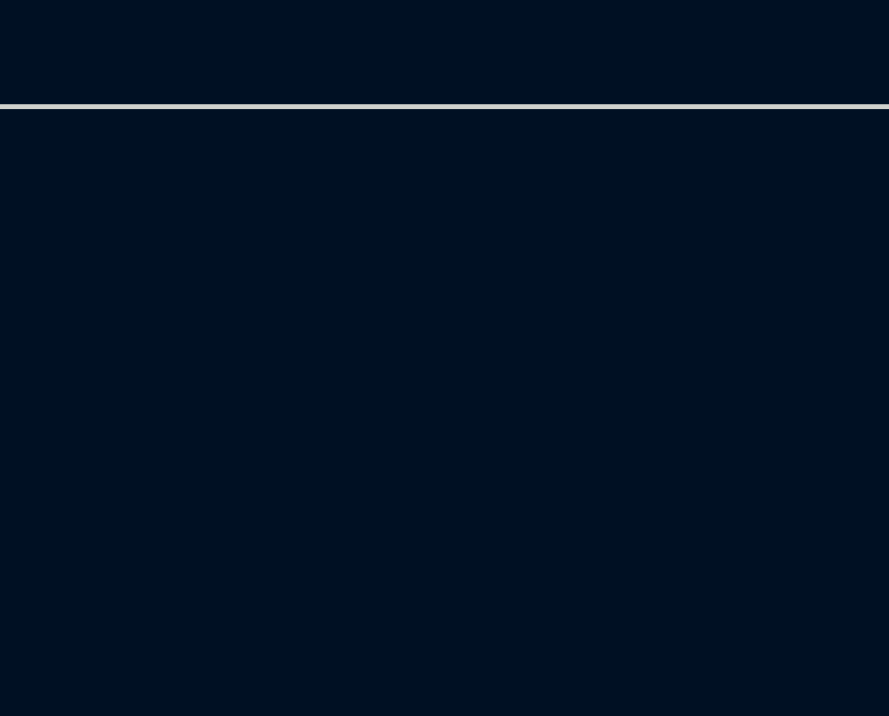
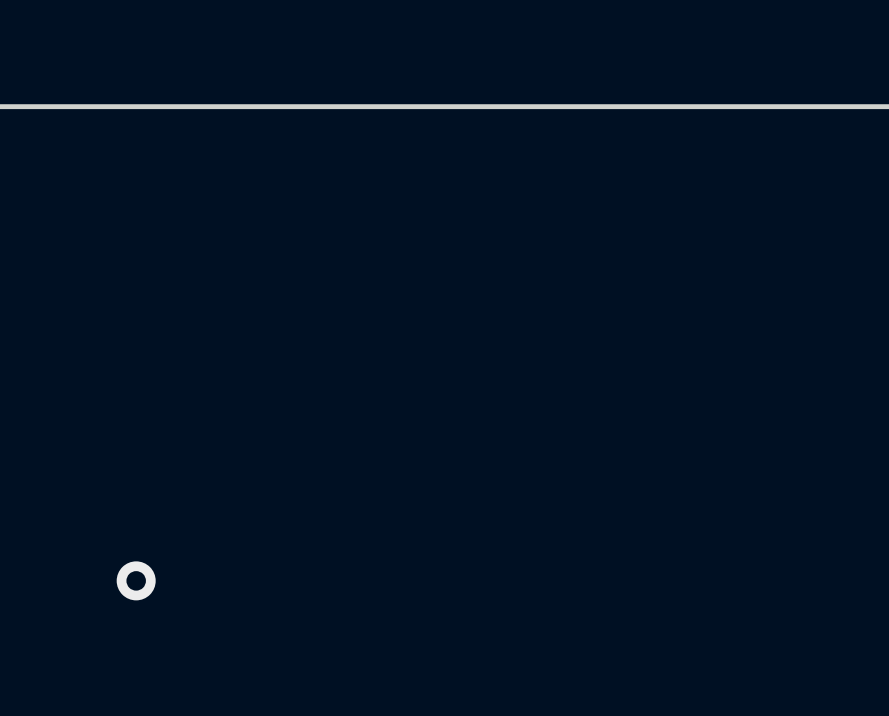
via: none -> (136, 580)

